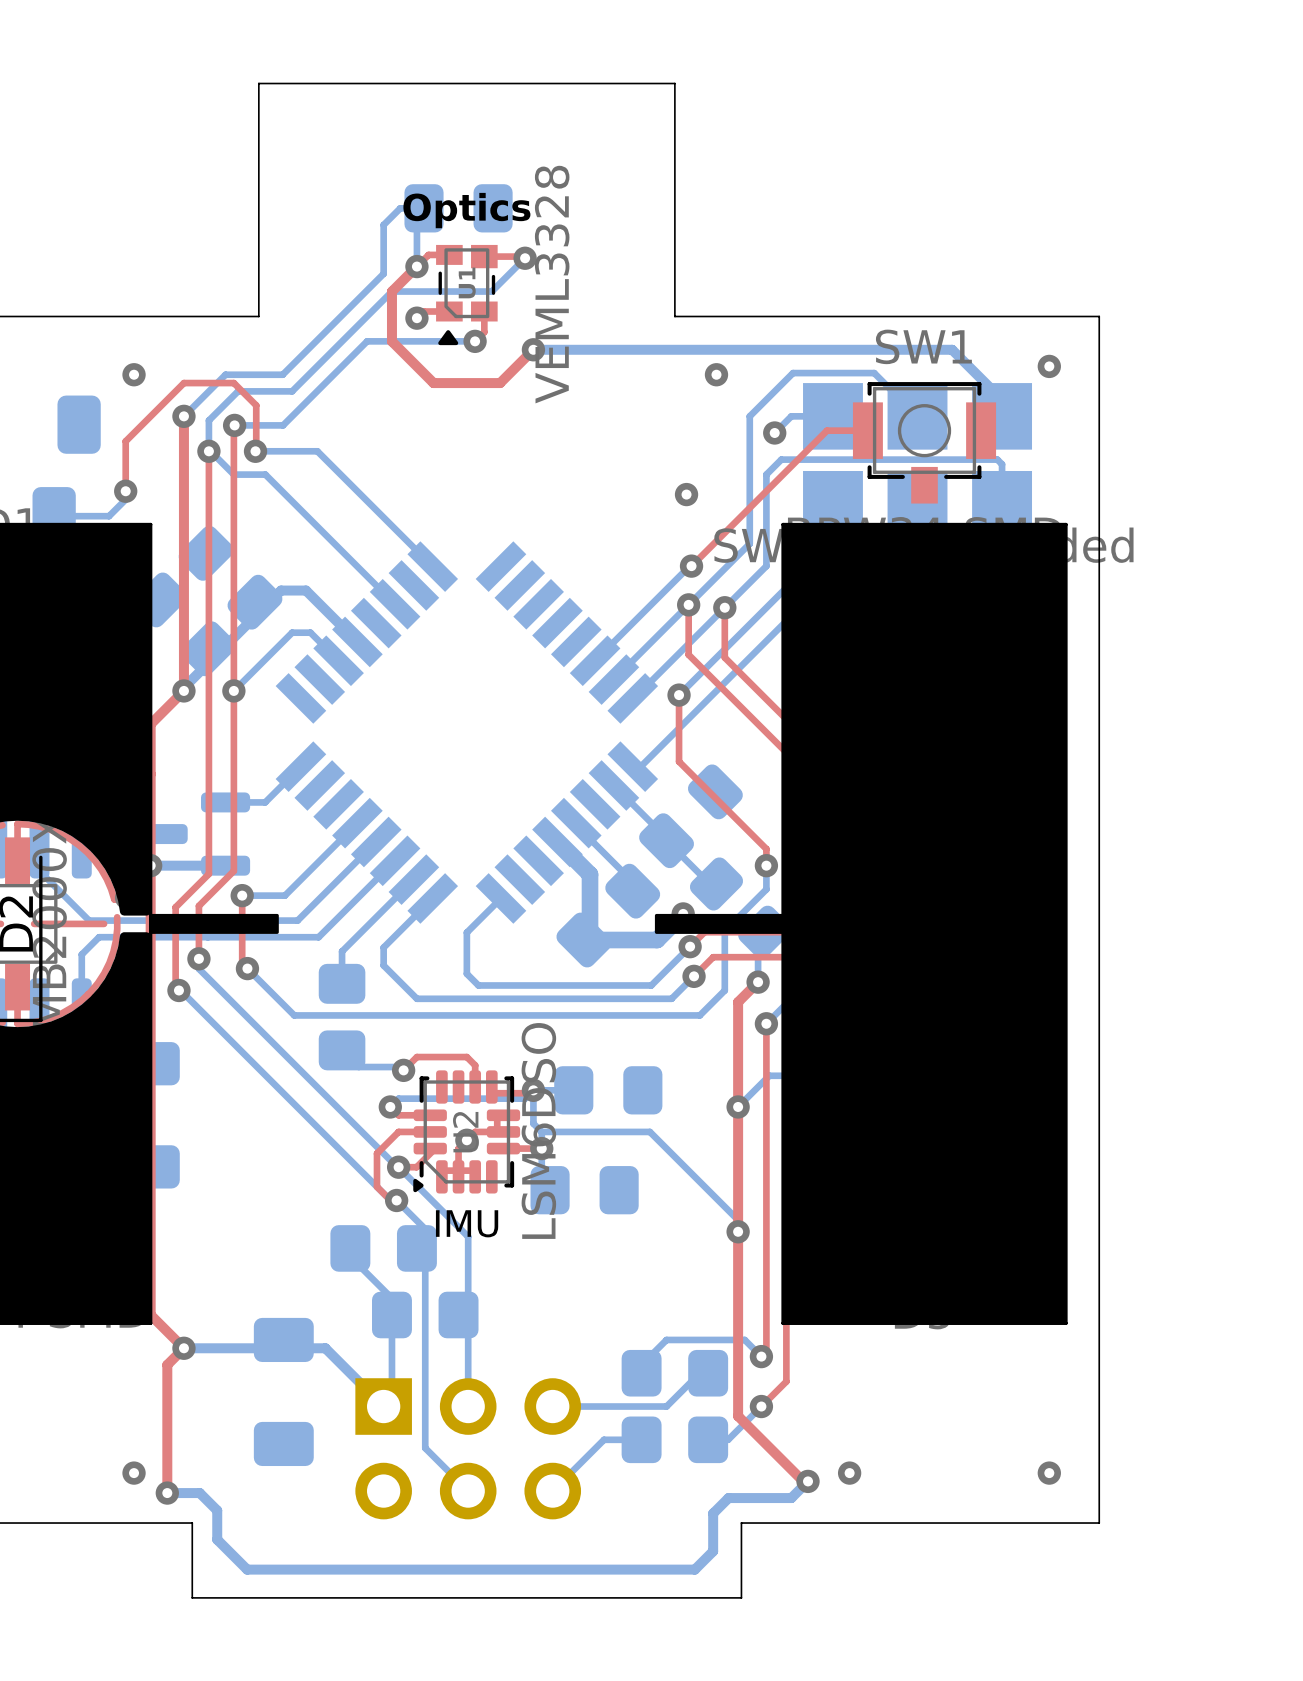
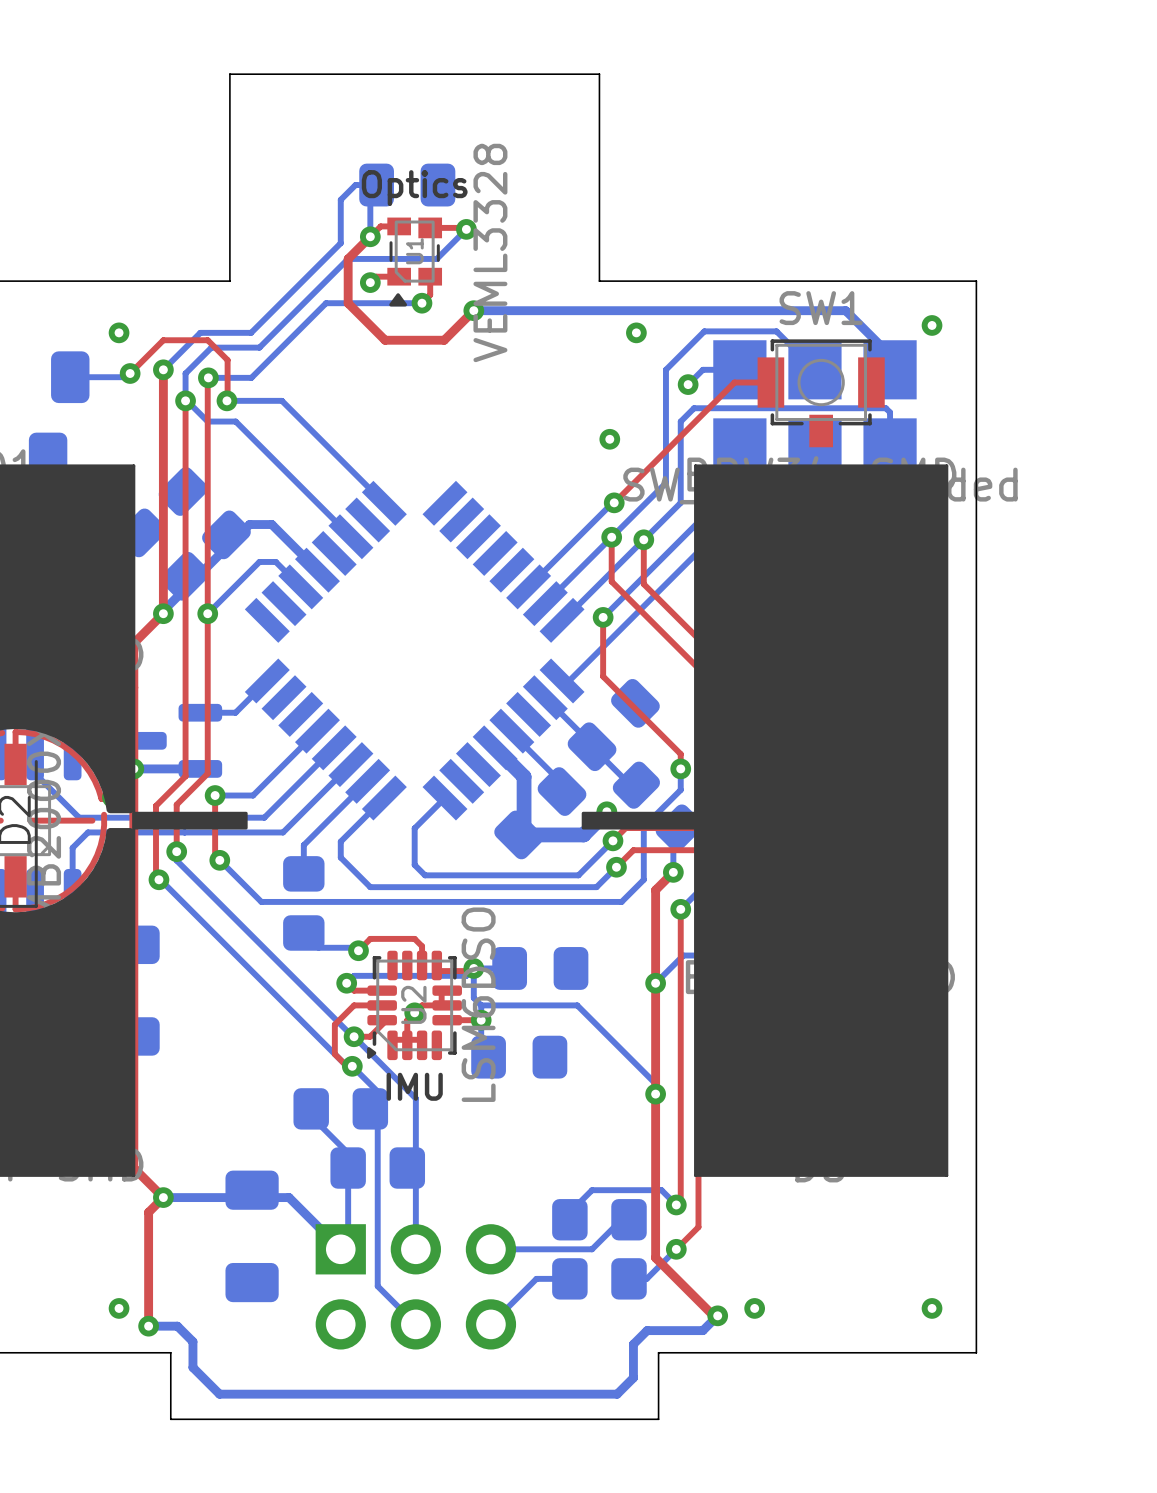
top track: (146, 420) (125, 441) (125, 491) -> none
bottom track: none -> (130, 373) (126, 377) (70, 377)
bottom track: (125, 491) (125, 499) (109, 516) (70, 516) -> none
via position: (125, 491) -> (130, 373)

